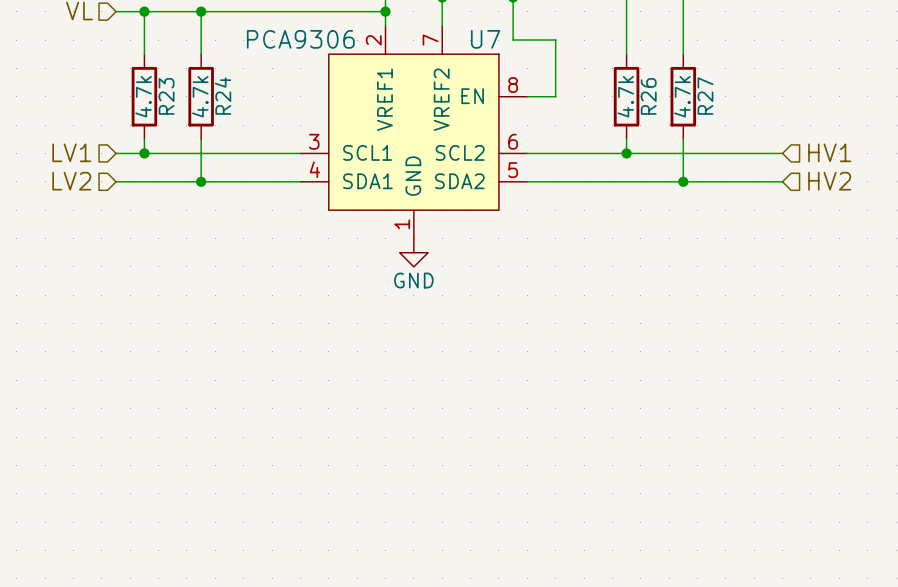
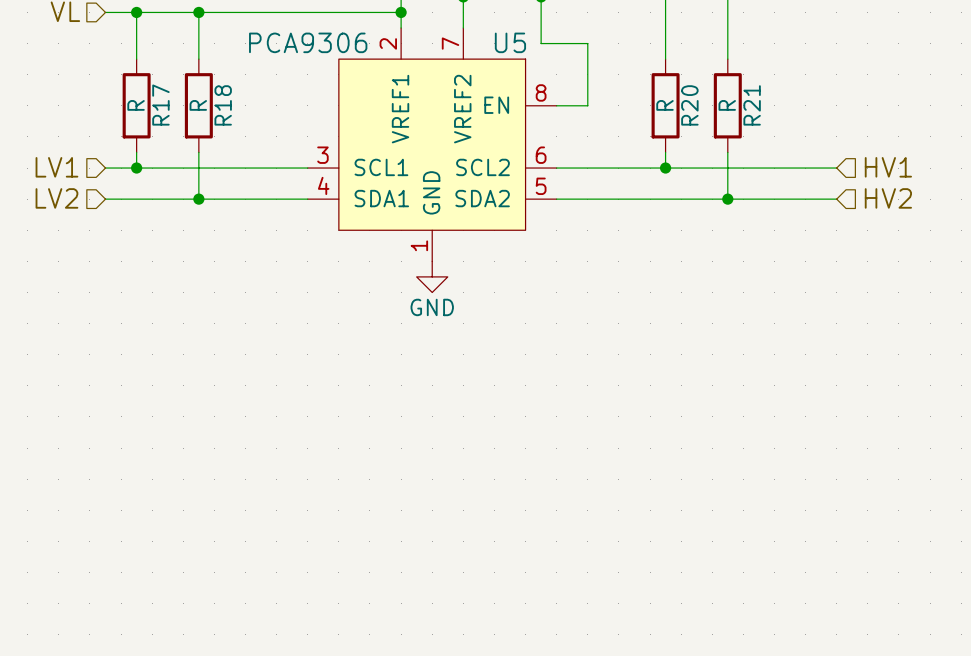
U7 name: U7 (485, 39) -> U5 (510, 42)
R23 value: 4.7k (143, 96) -> R (136, 105)
R23 name: R23 (166, 96) -> R17 (160, 105)
R24 value: 4.7k (200, 96) -> R (198, 105)
R24 name: R24 (222, 96) -> R18 (223, 105)
R26 value: 4.7k (625, 96) -> R (664, 105)
R26 name: R26 (648, 96) -> R20 (689, 105)
R27 value: 4.7k (682, 96) -> R (727, 105)
R27 name: R27 (705, 96) -> R21 (752, 105)

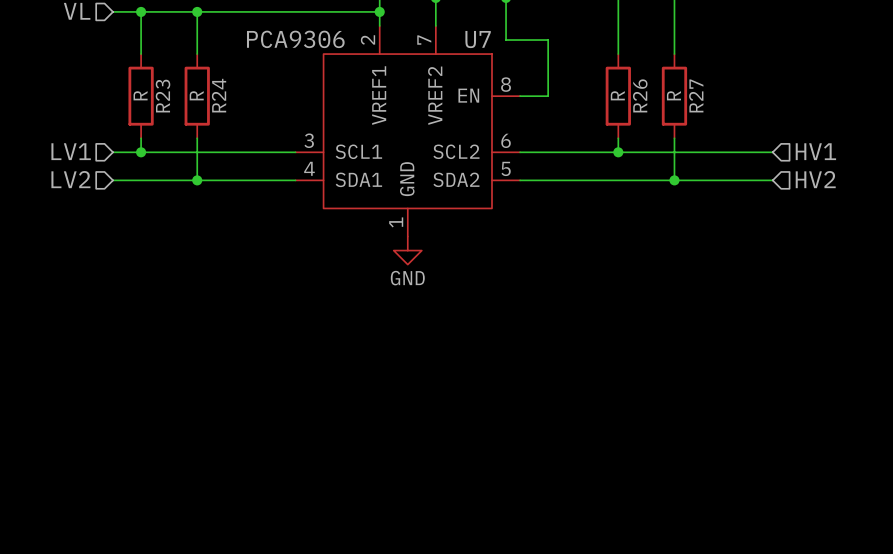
U5 name: U5 (510, 42) -> U7 (478, 39)
R17 name: R17 (160, 105) -> R23 (163, 96)
R18 name: R18 (223, 105) -> R24 (219, 95)
R20 name: R20 (689, 105) -> R26 (640, 95)
R21 name: R21 (752, 105) -> R27 (696, 95)

